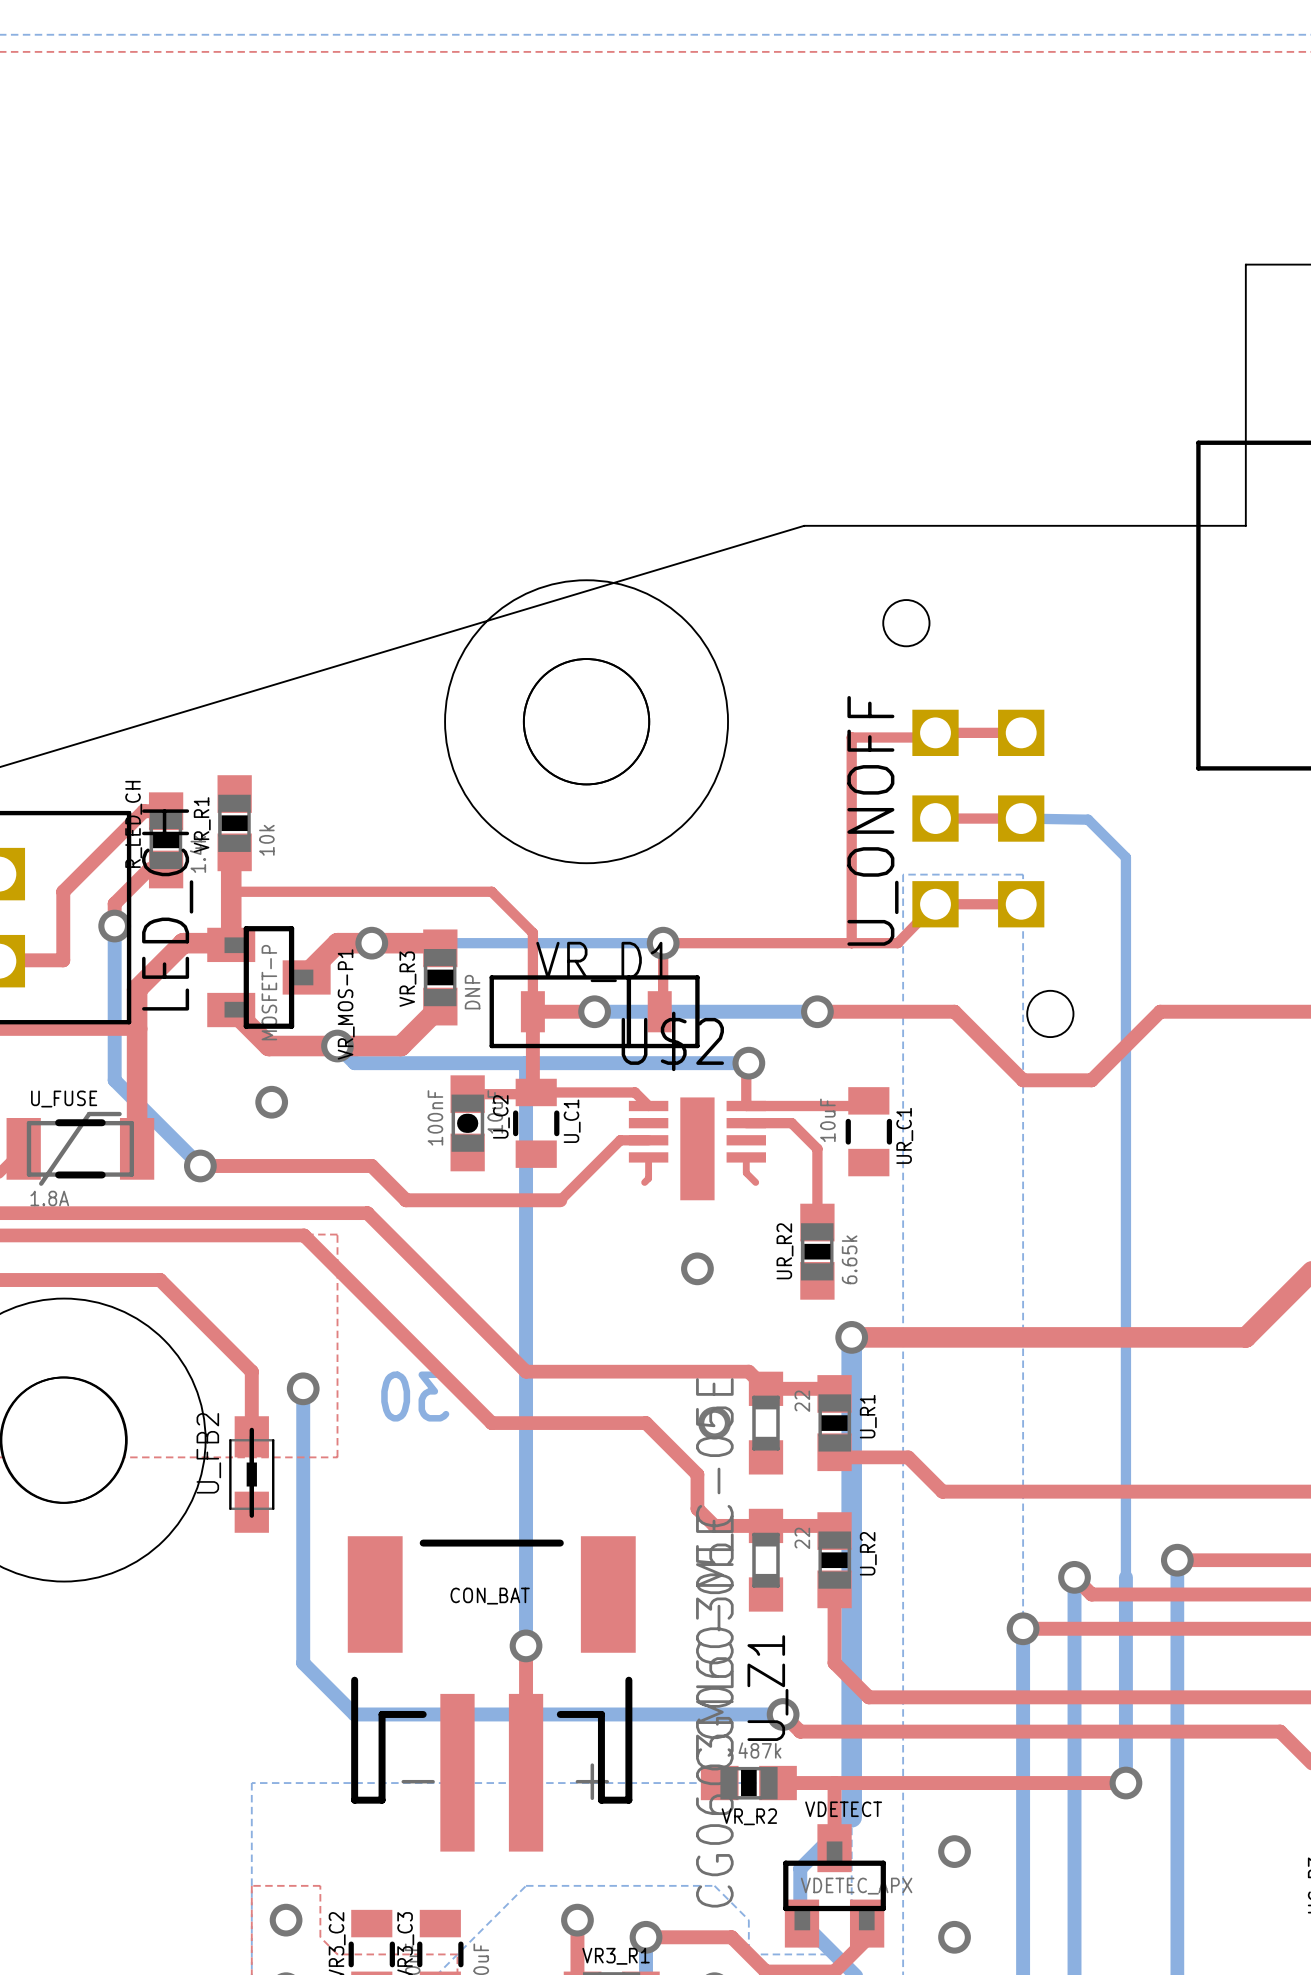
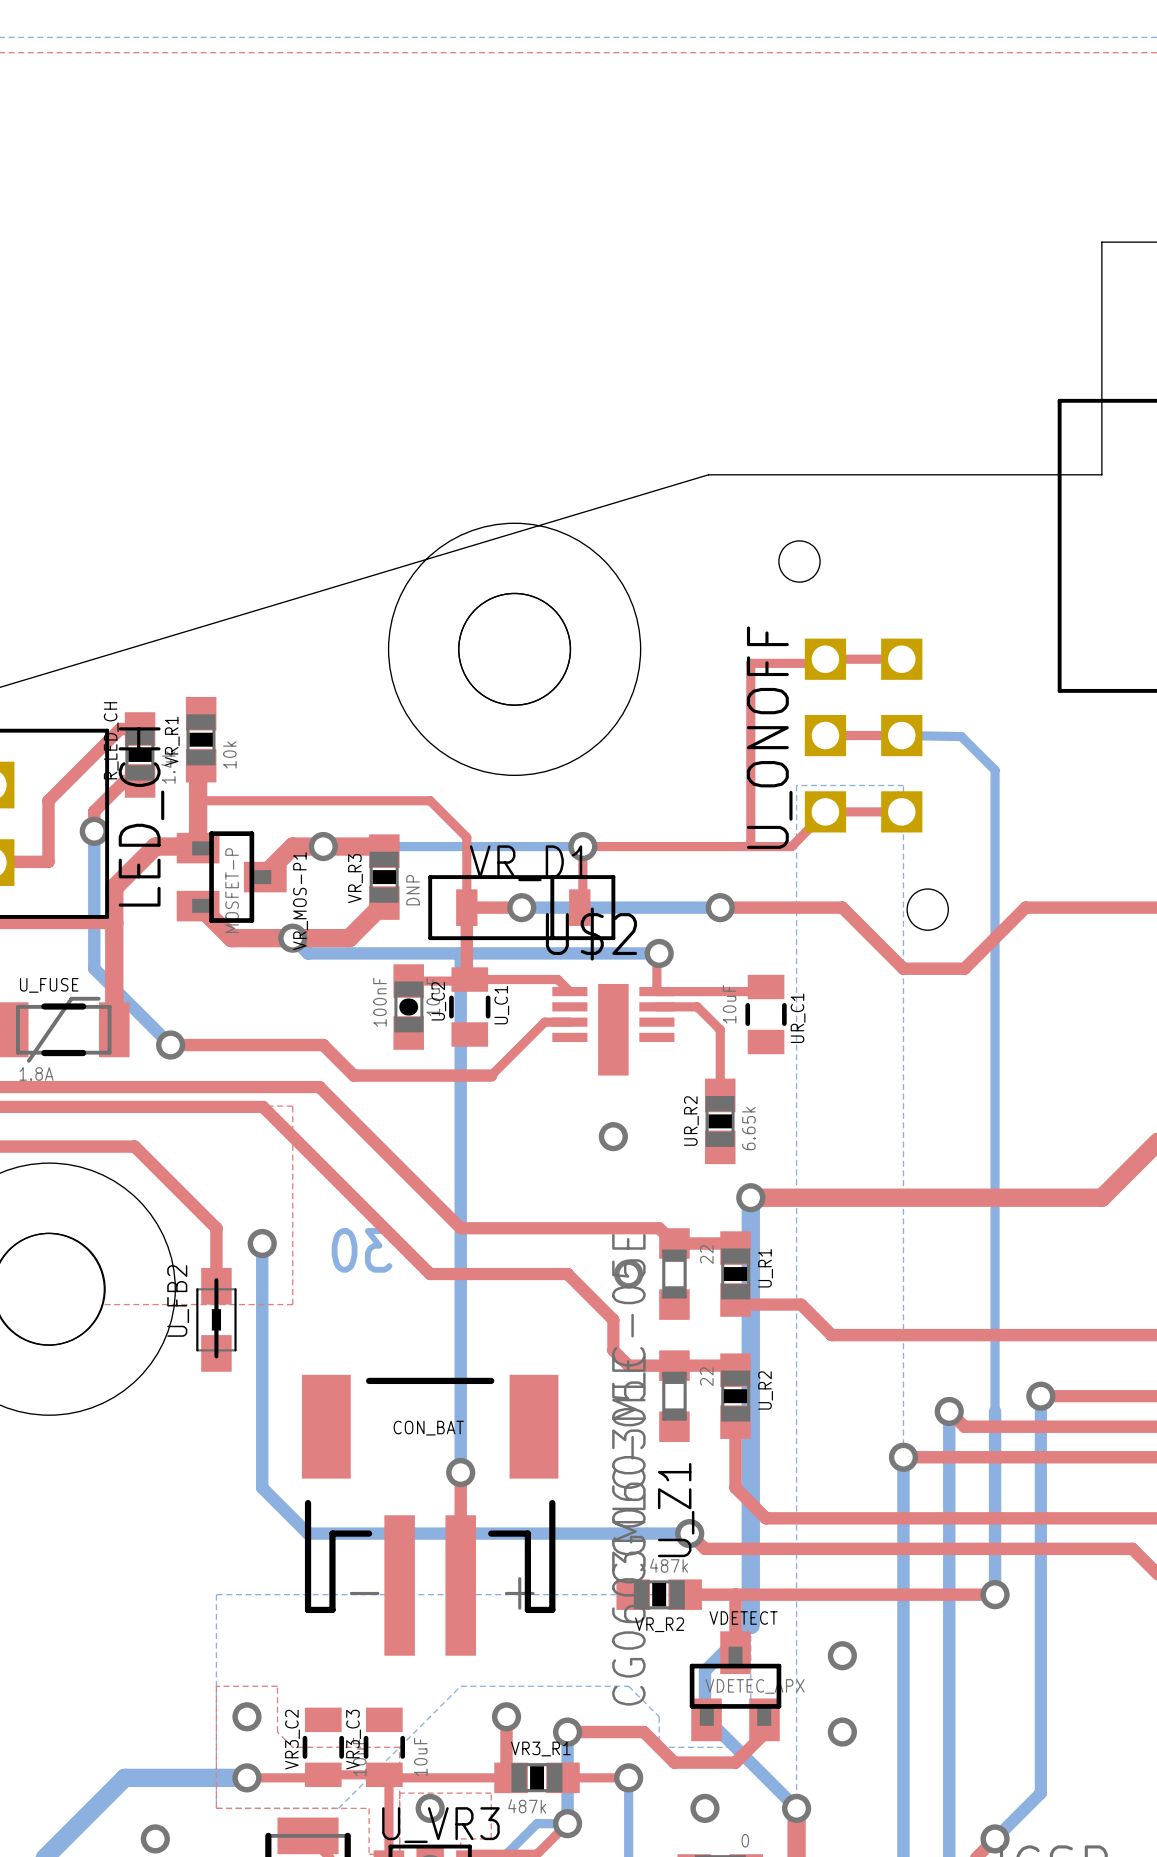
via: (271, 1102) -> none
top track: (648, 1157) (648, 1178) (644, 1182) -> none
top track: (746, 1157) (746, 1173) (755, 1182) -> none

